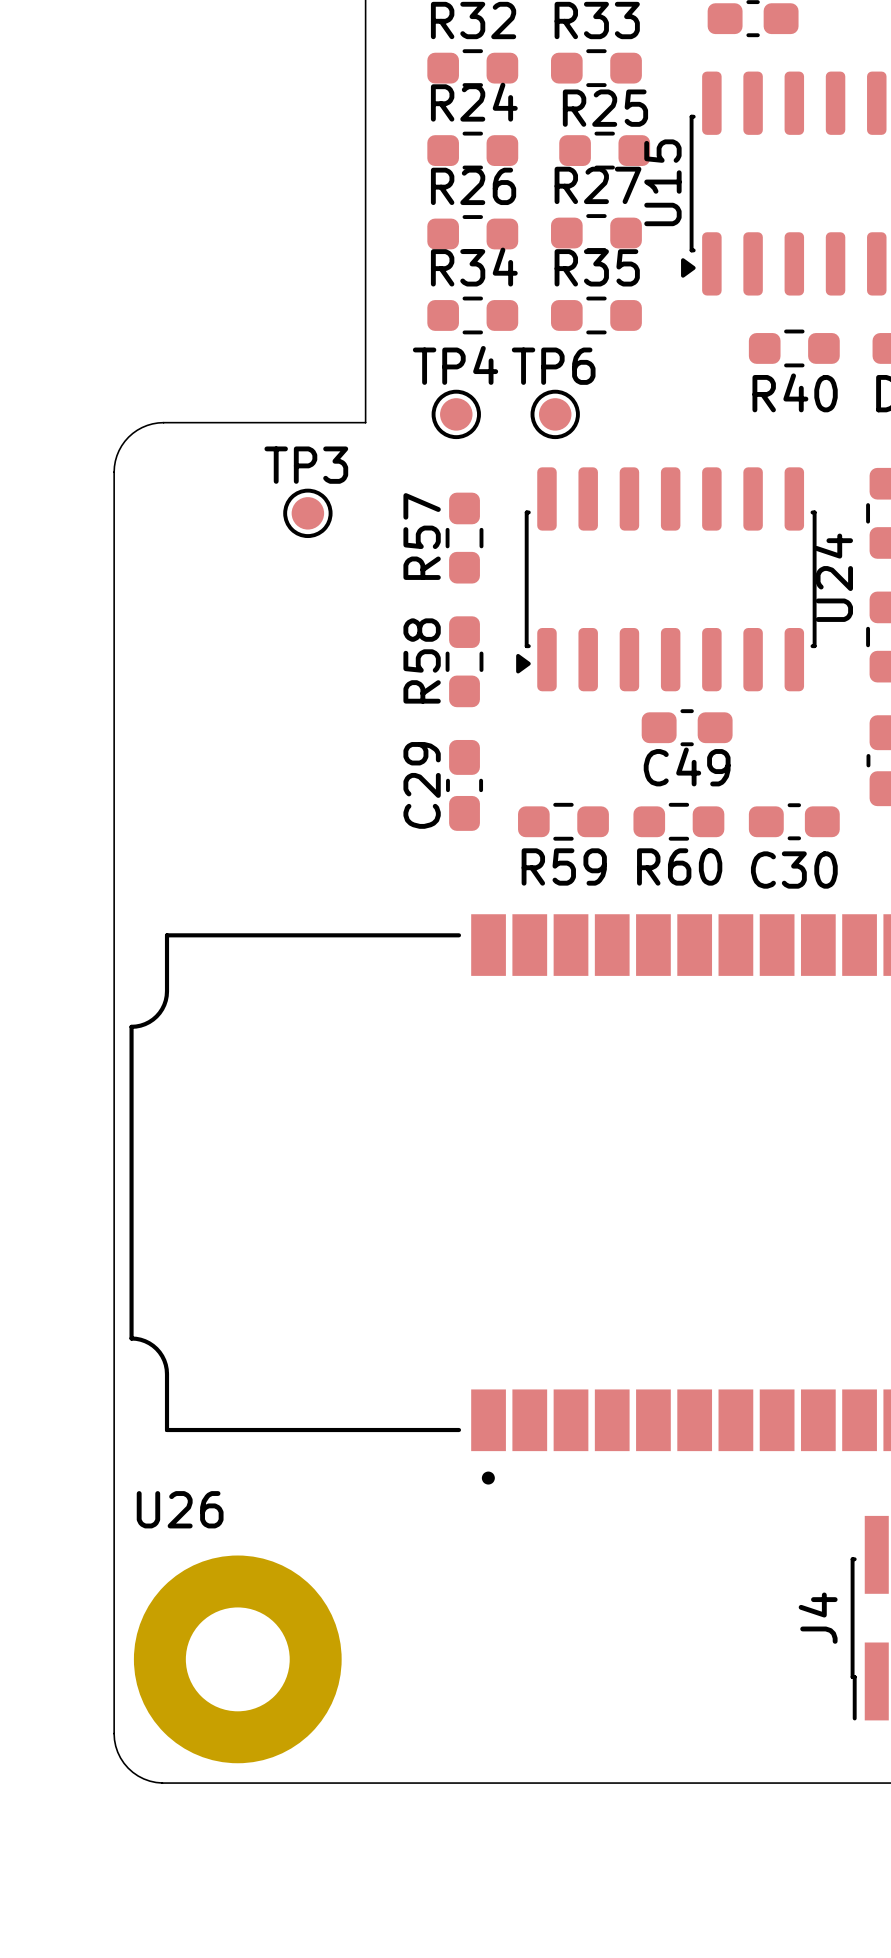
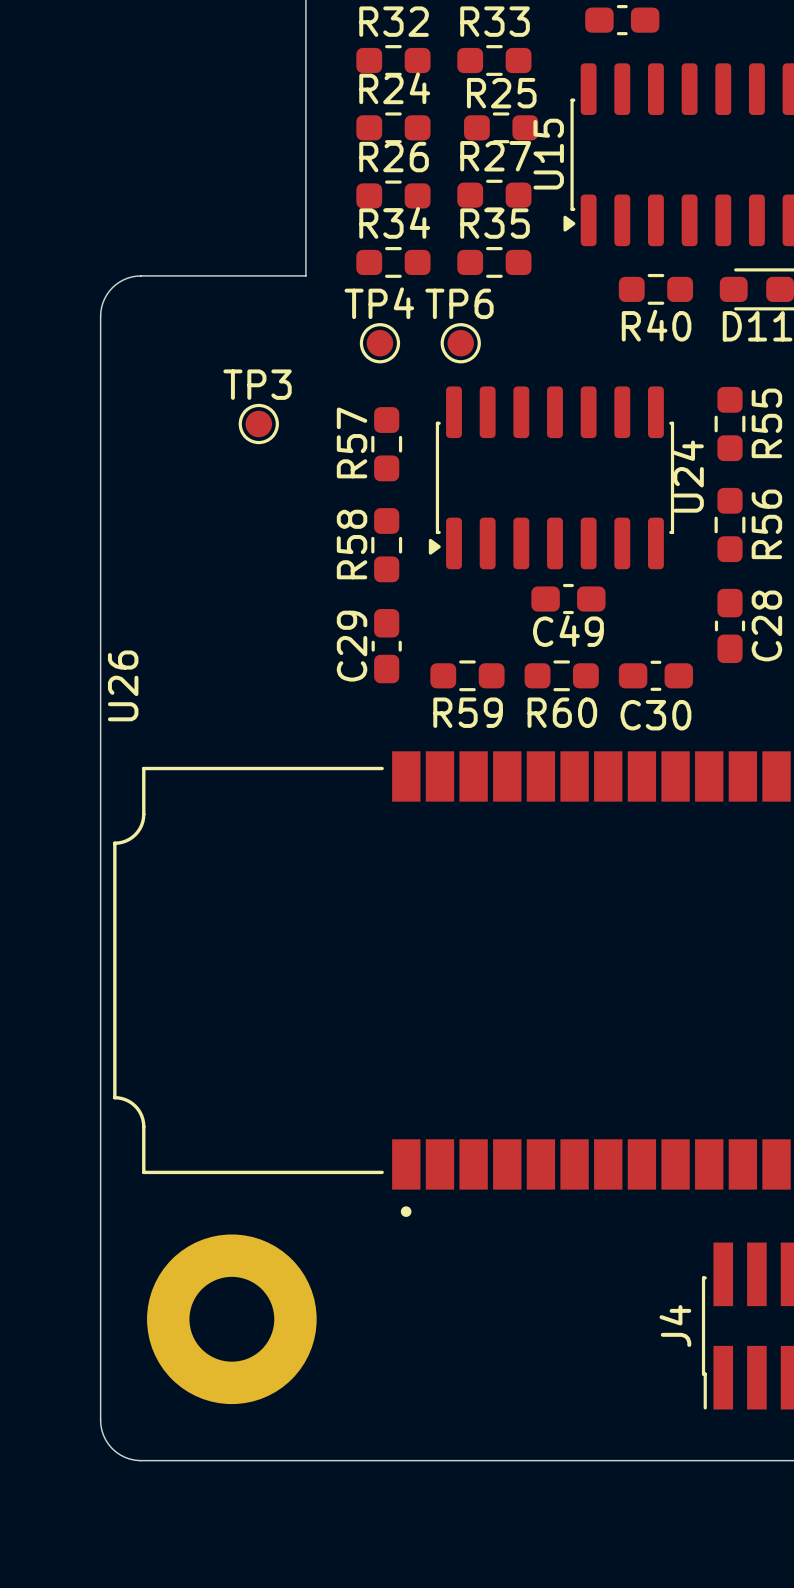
board edge: (365, 331) (365, 422) (152, 423) (137, 430) (124, 441) (116, 455) (114, 472) -> (305, 275) (141, 275) (127, 278) (119, 282) (106, 294) (101, 307) (100, 390)
U26 name rotation: 0° (180, 1509) -> 90° counterclockwise (123, 685)
U26 name position: U26 (180, 1509) -> U26 (123, 685)
part position: (237, 1659) -> (231, 1319)

